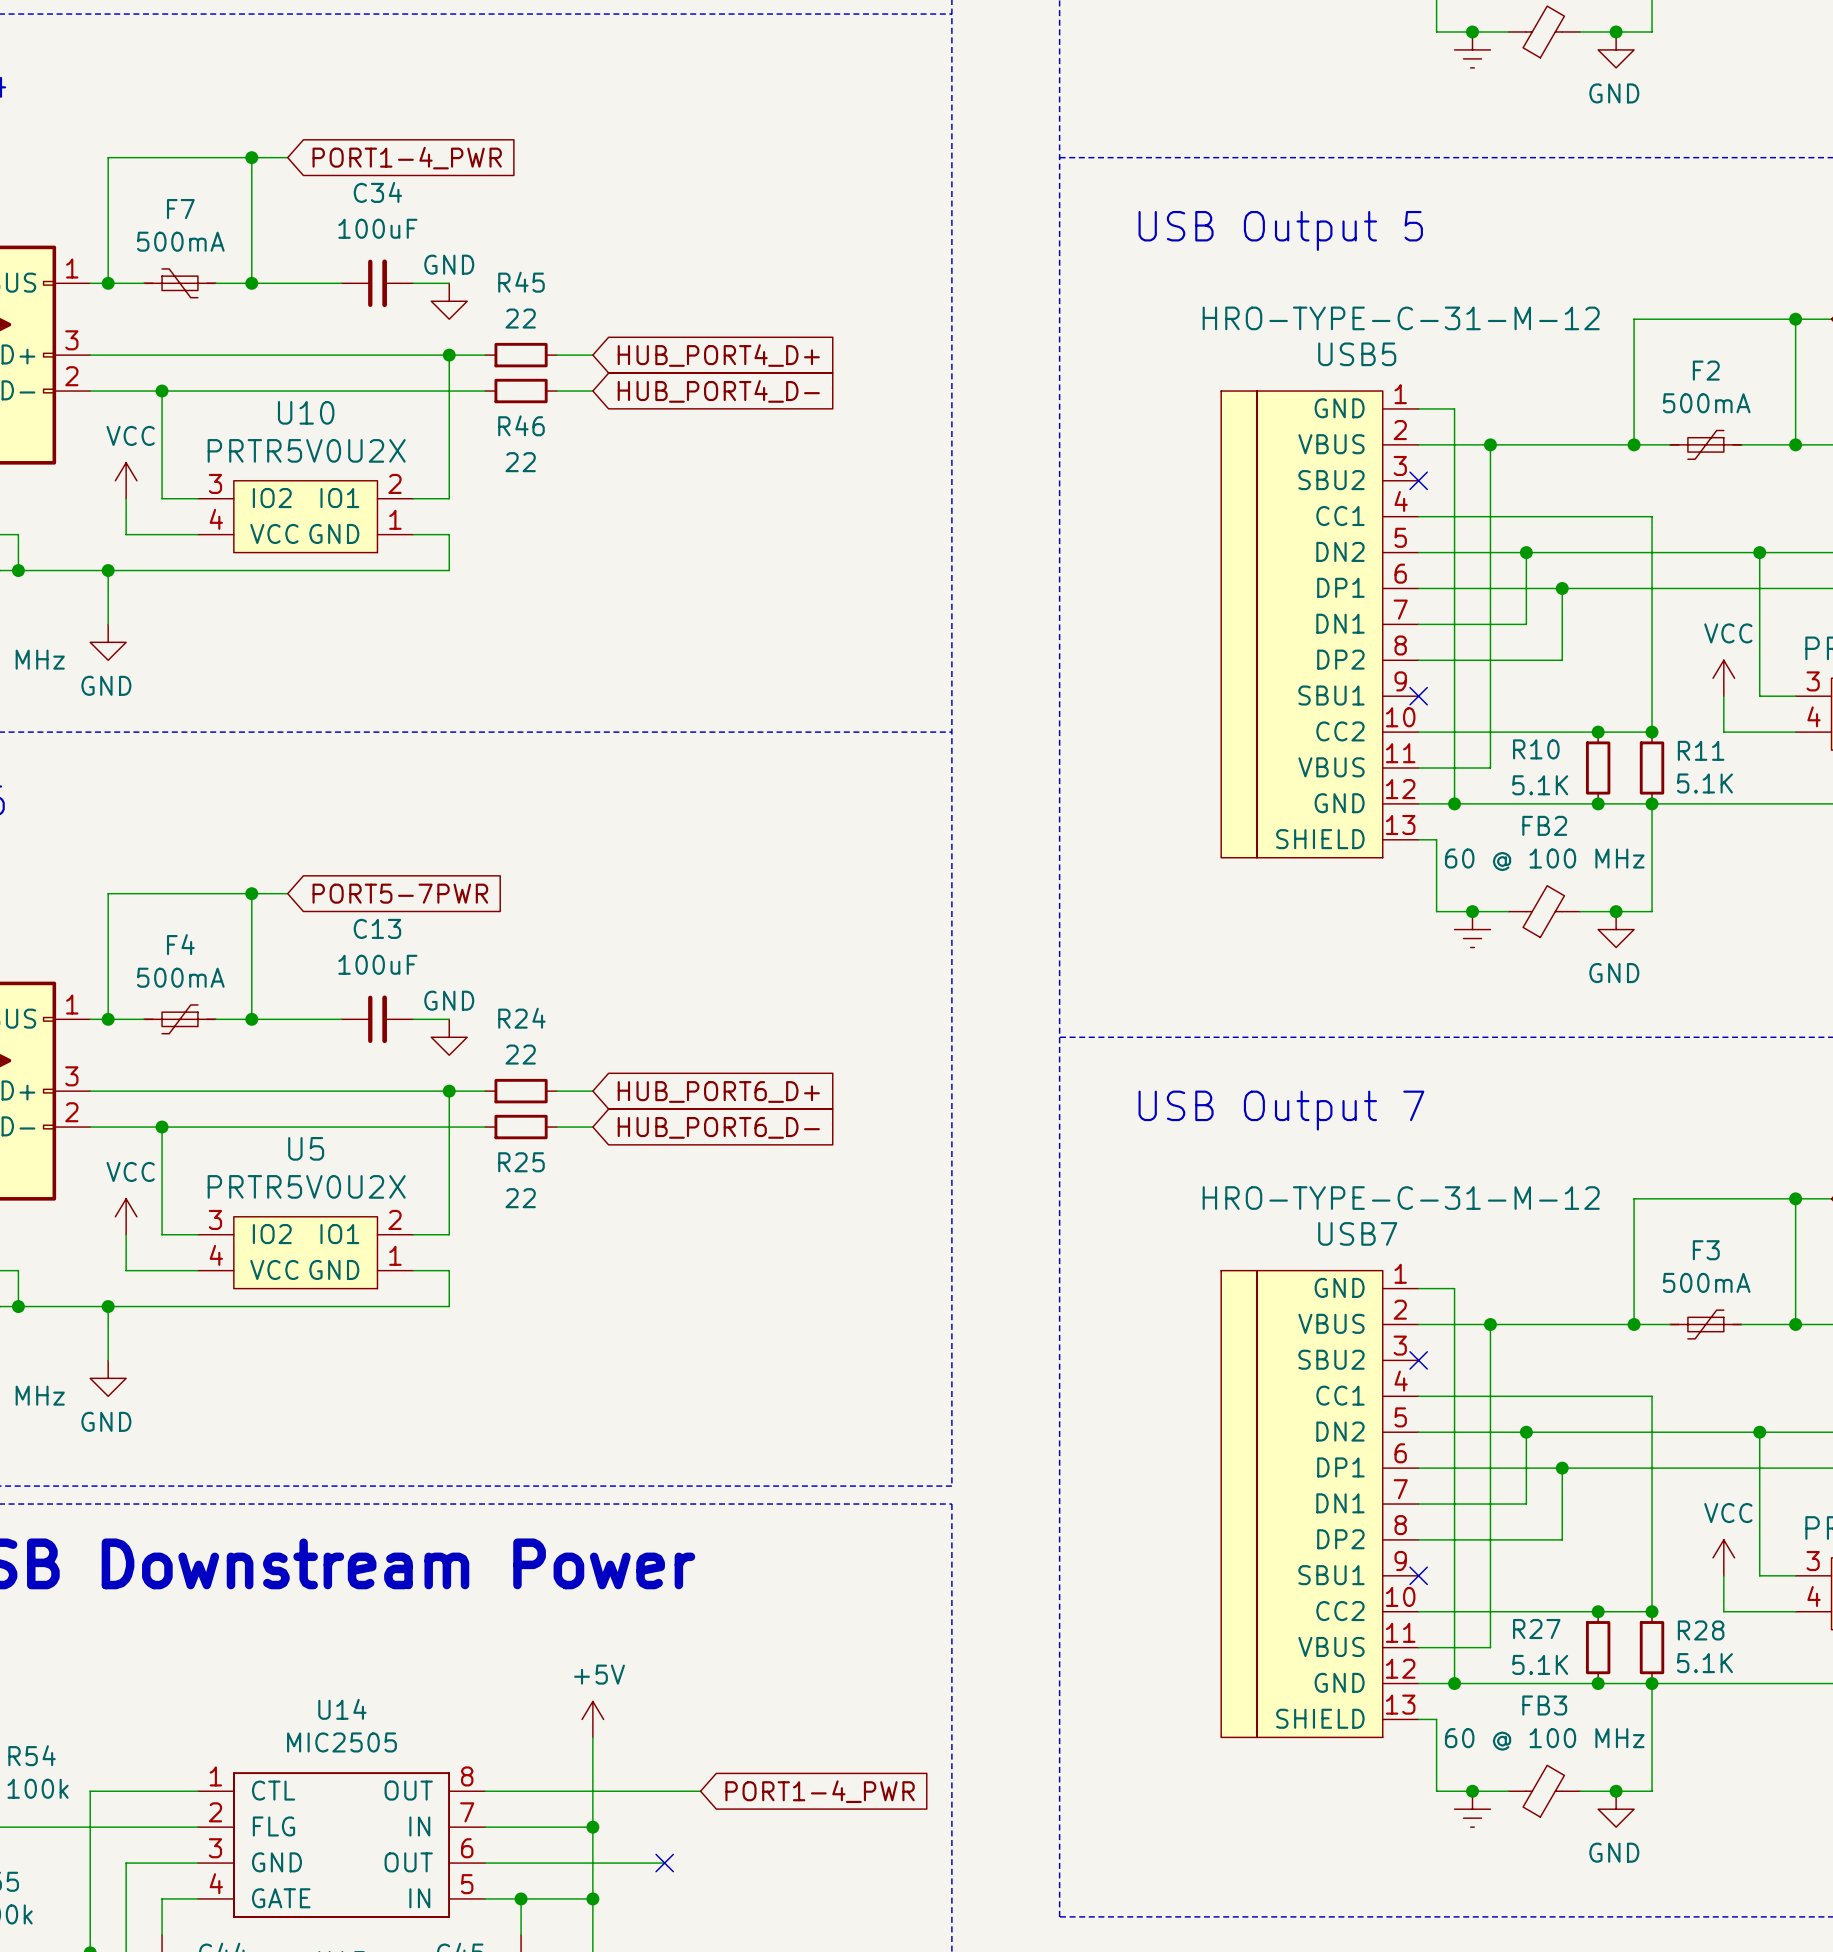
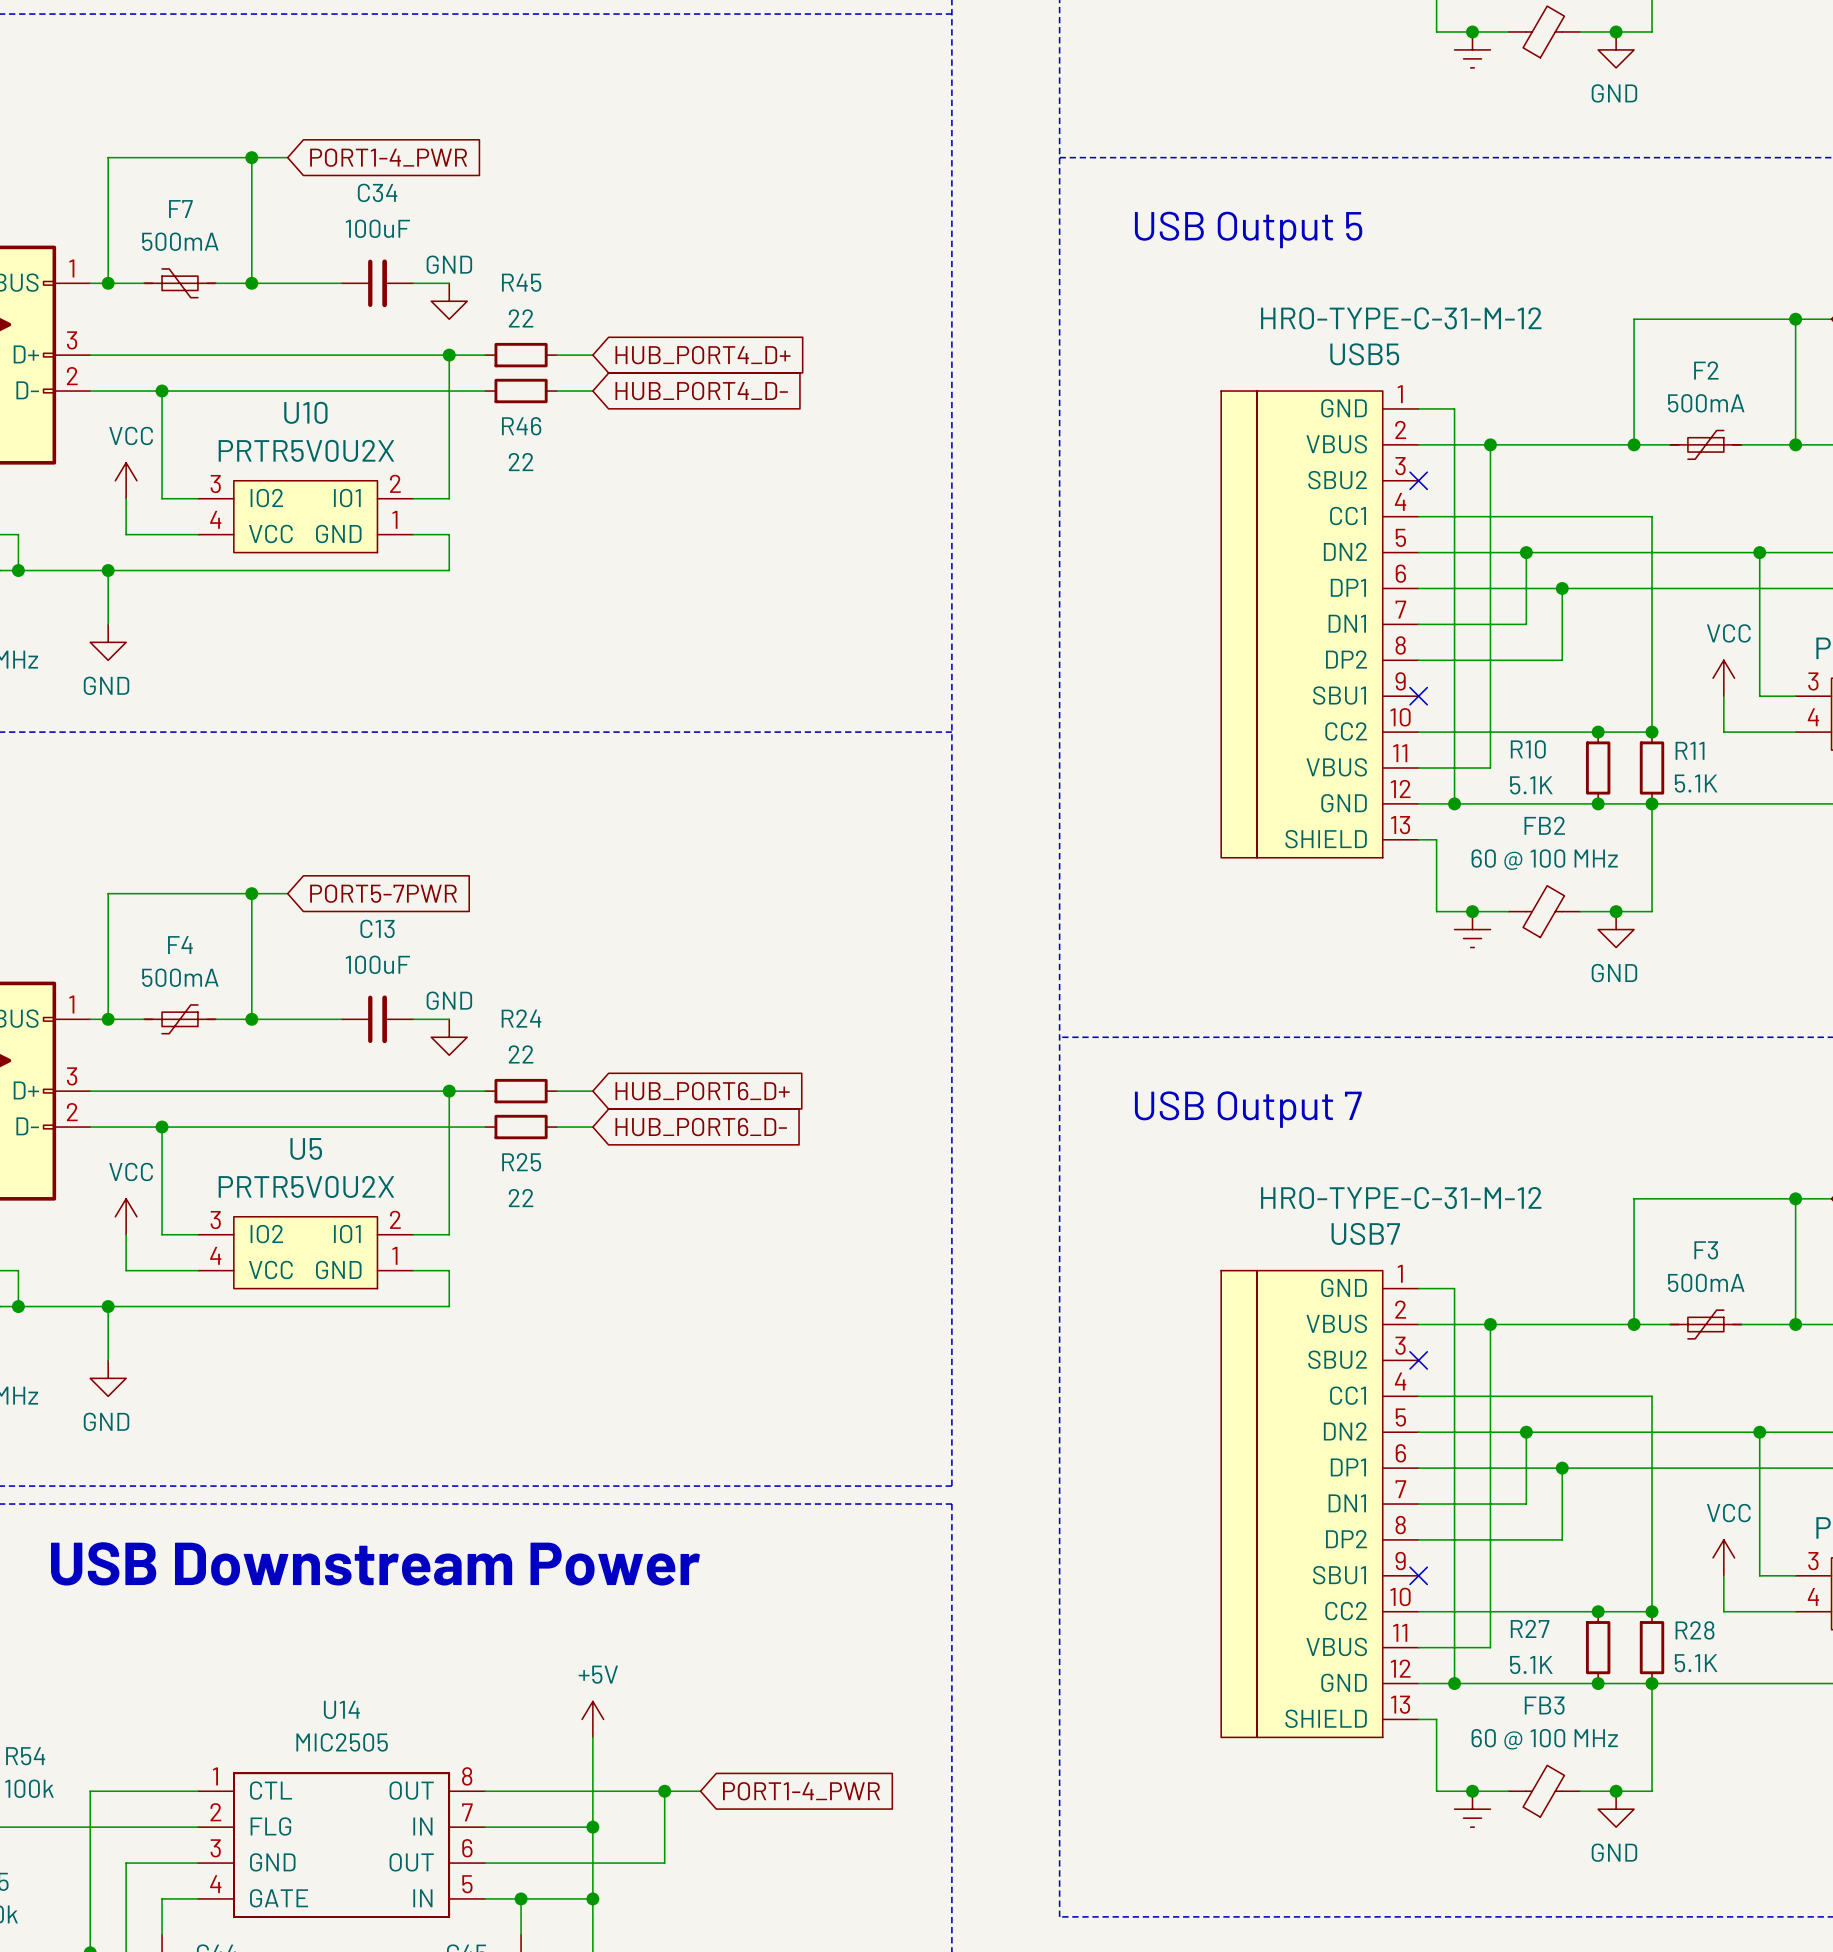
wire: none -> (664, 1791) (664, 1863)
junction: none -> (664, 1791)
no-connect mark: (664, 1863) -> none

